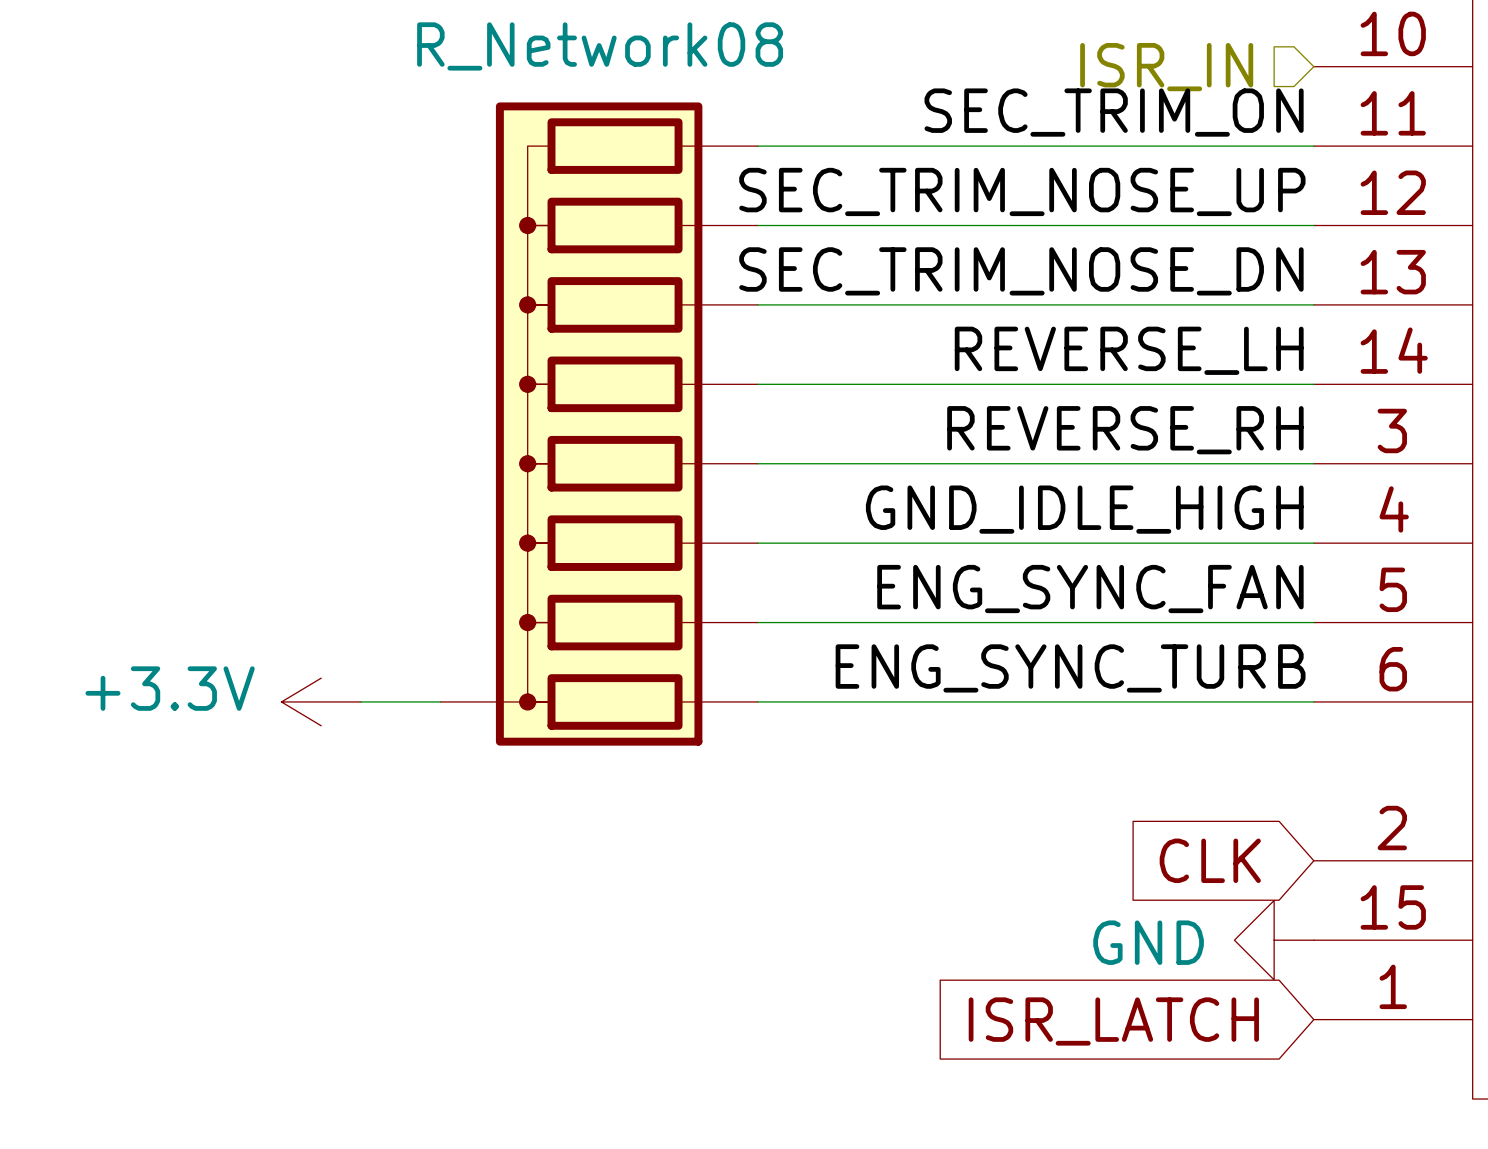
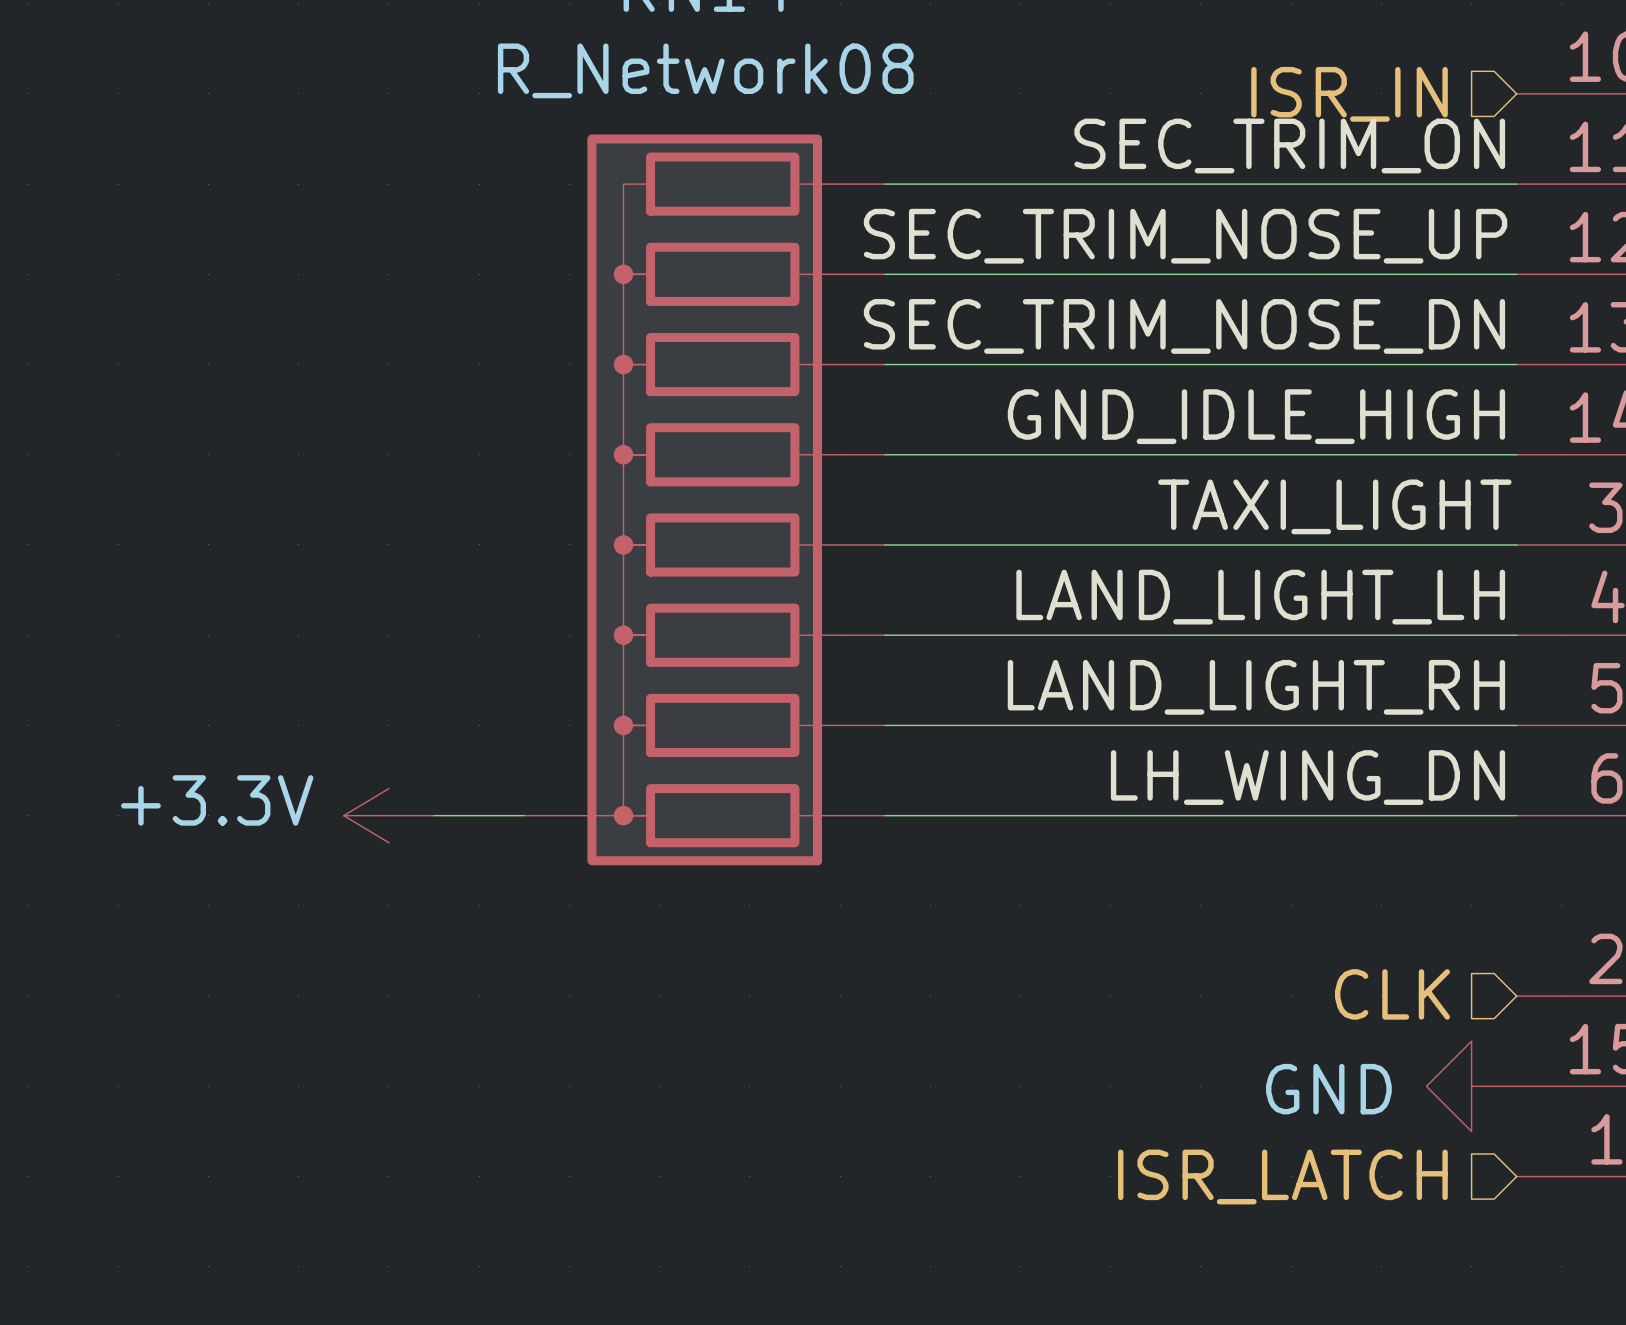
label: REVERSE_LH (1129, 350) -> GND_IDLE_HIGH (1256, 416)
label: REVERSE_RH (1125, 430) -> TAXI_LIGHT (1334, 506)
label: GND_IDLE_HIGH (1084, 509) -> LAND_LIGHT_LH (1260, 597)
label: ENG_SYNC_FAN (1090, 589) -> LAND_LIGHT_RH (1256, 687)
label: ENG_SYNC_TURB (1070, 668) -> LH_WING_DN (1307, 777)
hierarchical label: none -> CLK (1392, 994)
global label: CLK (1210, 860) -> none
hierarchical label: none -> ISR_LATCH (1282, 1177)
global label: ISR_LATCH (1113, 1021) -> none

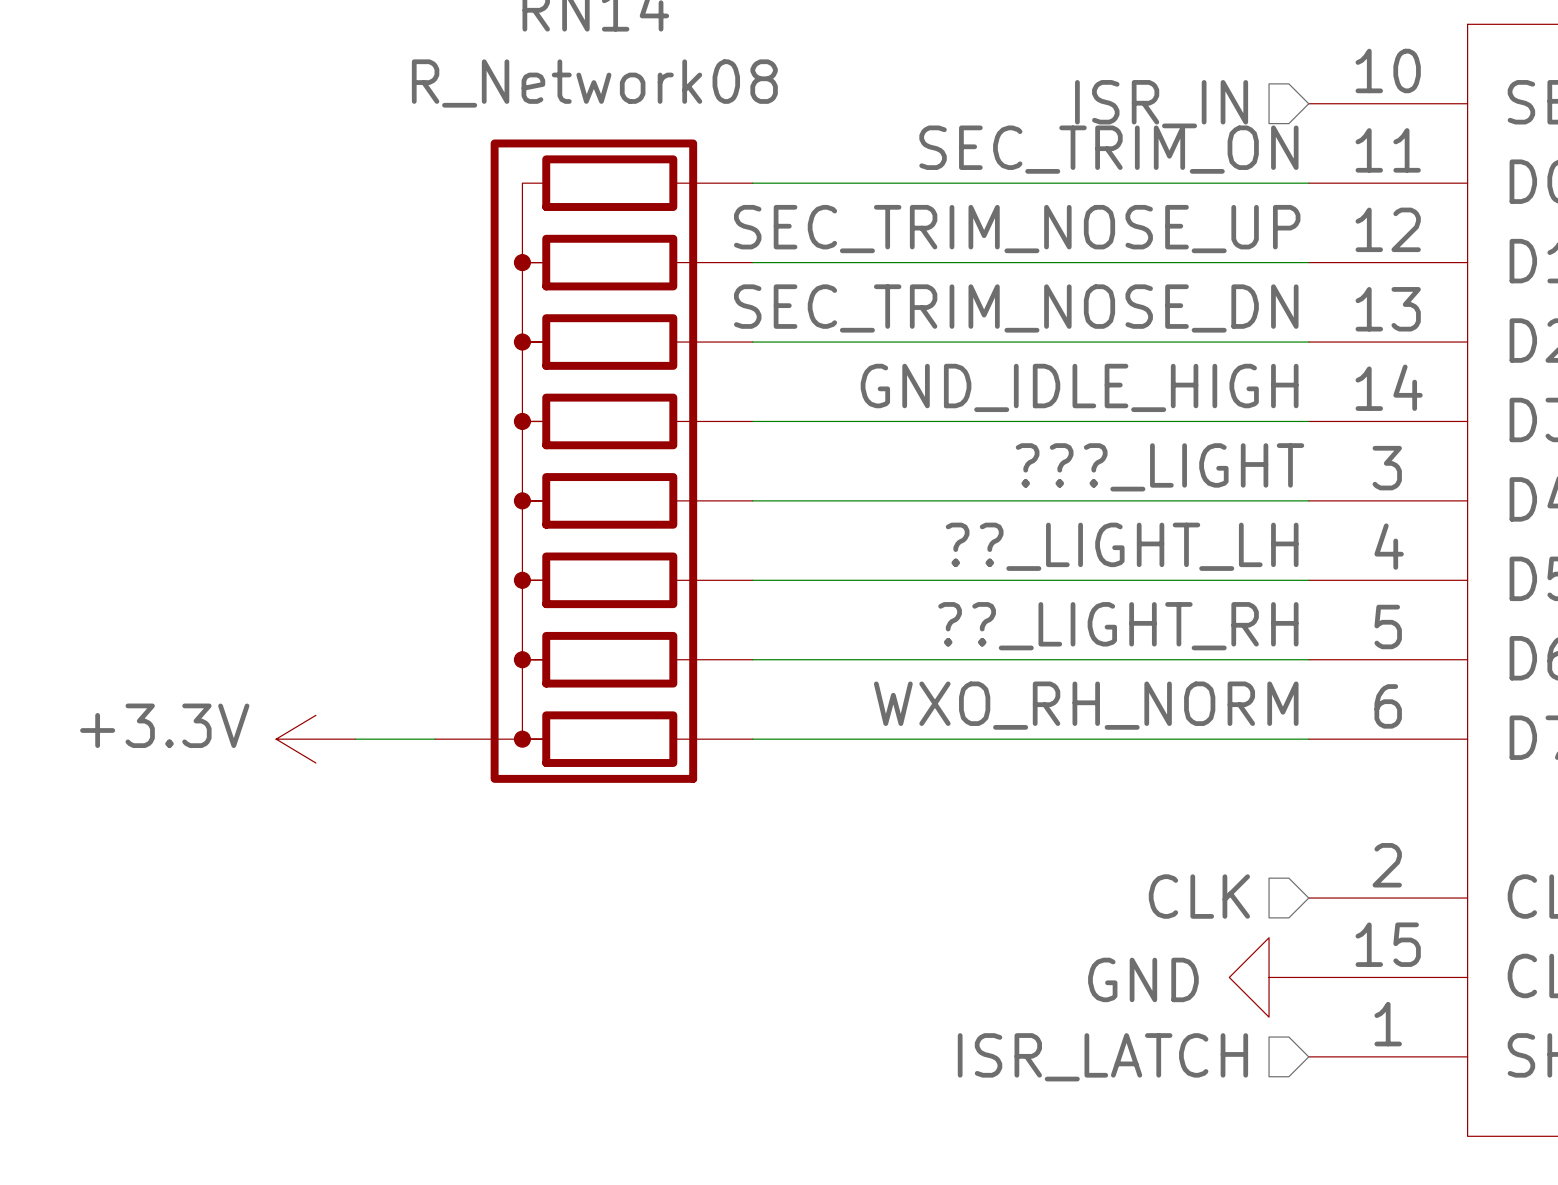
label: TAXI_LIGHT (1334, 506) -> ???_LIGHT (1159, 467)
label: LAND_LIGHT_LH (1260, 597) -> ??_LIGHT_LH (1122, 546)
label: LAND_LIGHT_RH (1256, 687) -> ??_LIGHT_RH (1118, 626)
label: LH_WING_DN (1307, 777) -> WXO_RH_NORM (1086, 705)

